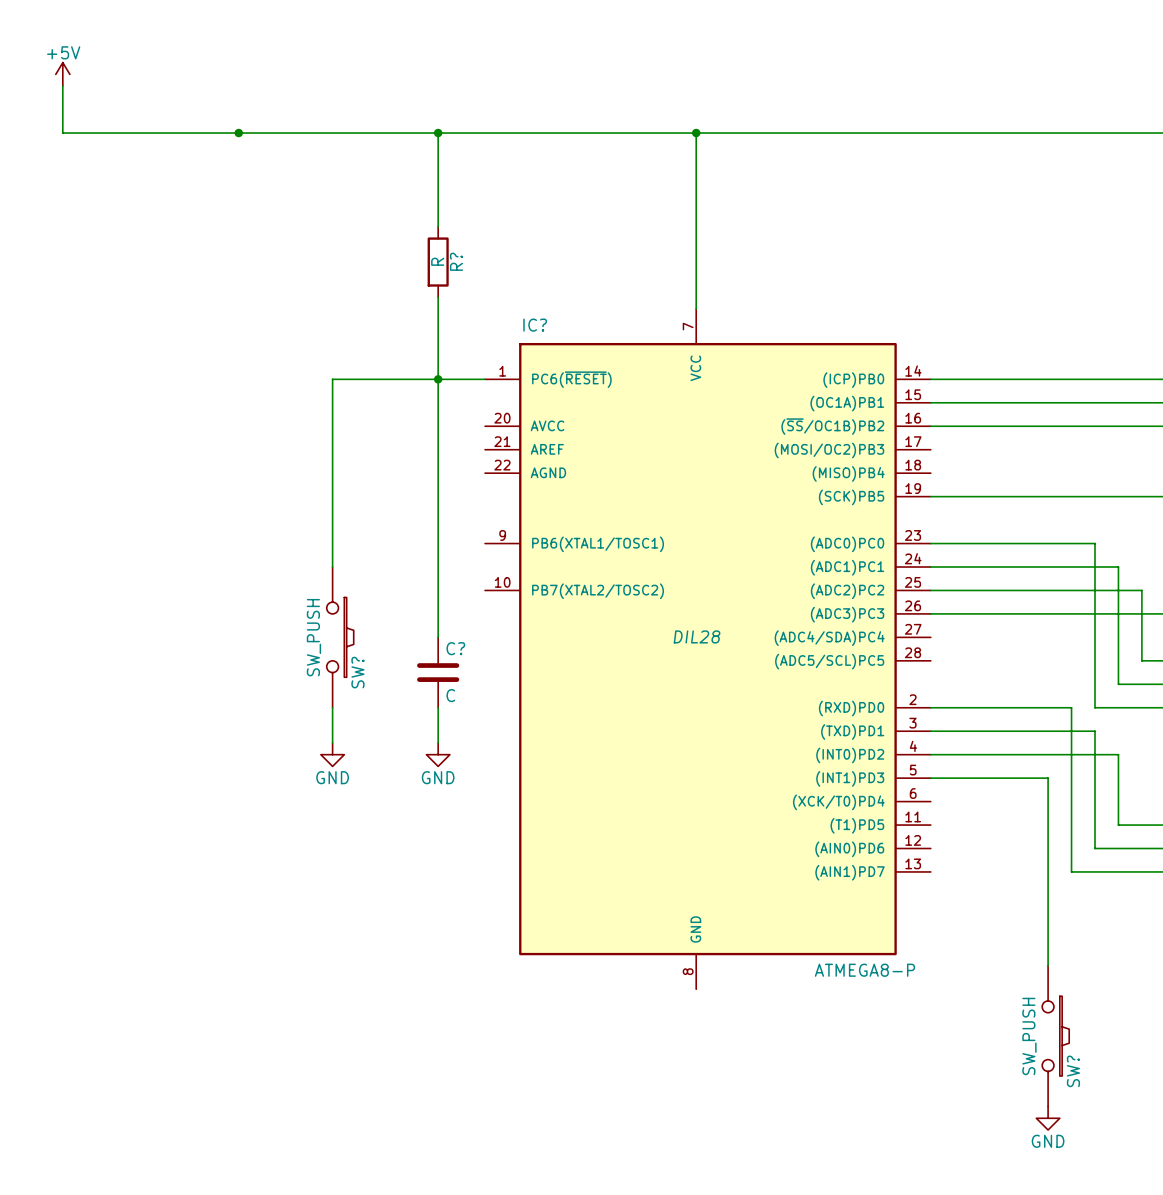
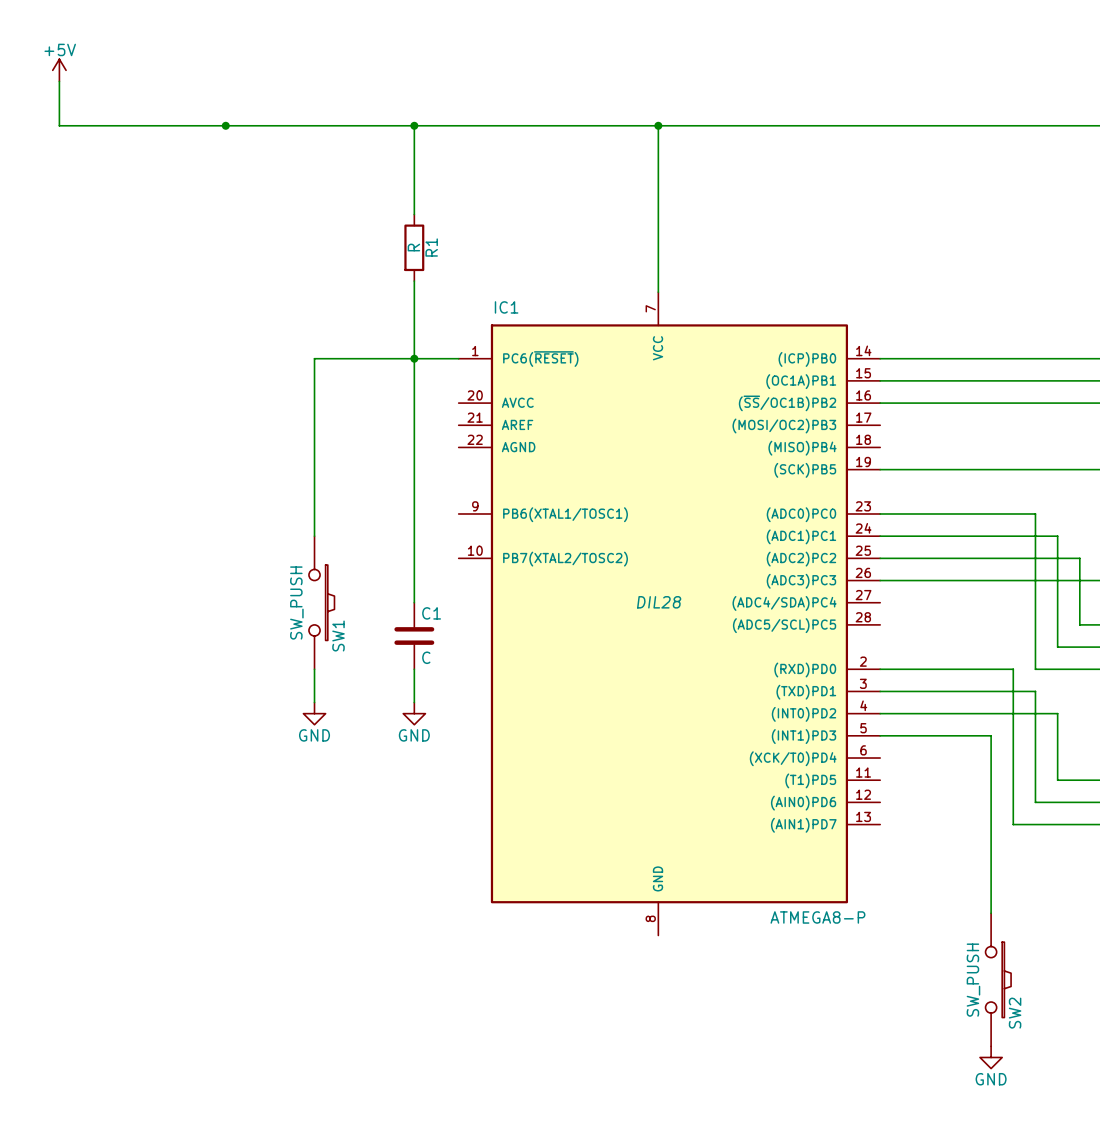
R? name: R? (456, 261) -> R1 (431, 247)
IC? name: IC? (535, 325) -> IC1 (506, 307)
C? name: C? (455, 648) -> C1 (431, 613)
SW? name: SW? (357, 672) -> SW1 (338, 636)
SW? name: SW? (1073, 1071) -> SW2 (1015, 1013)

